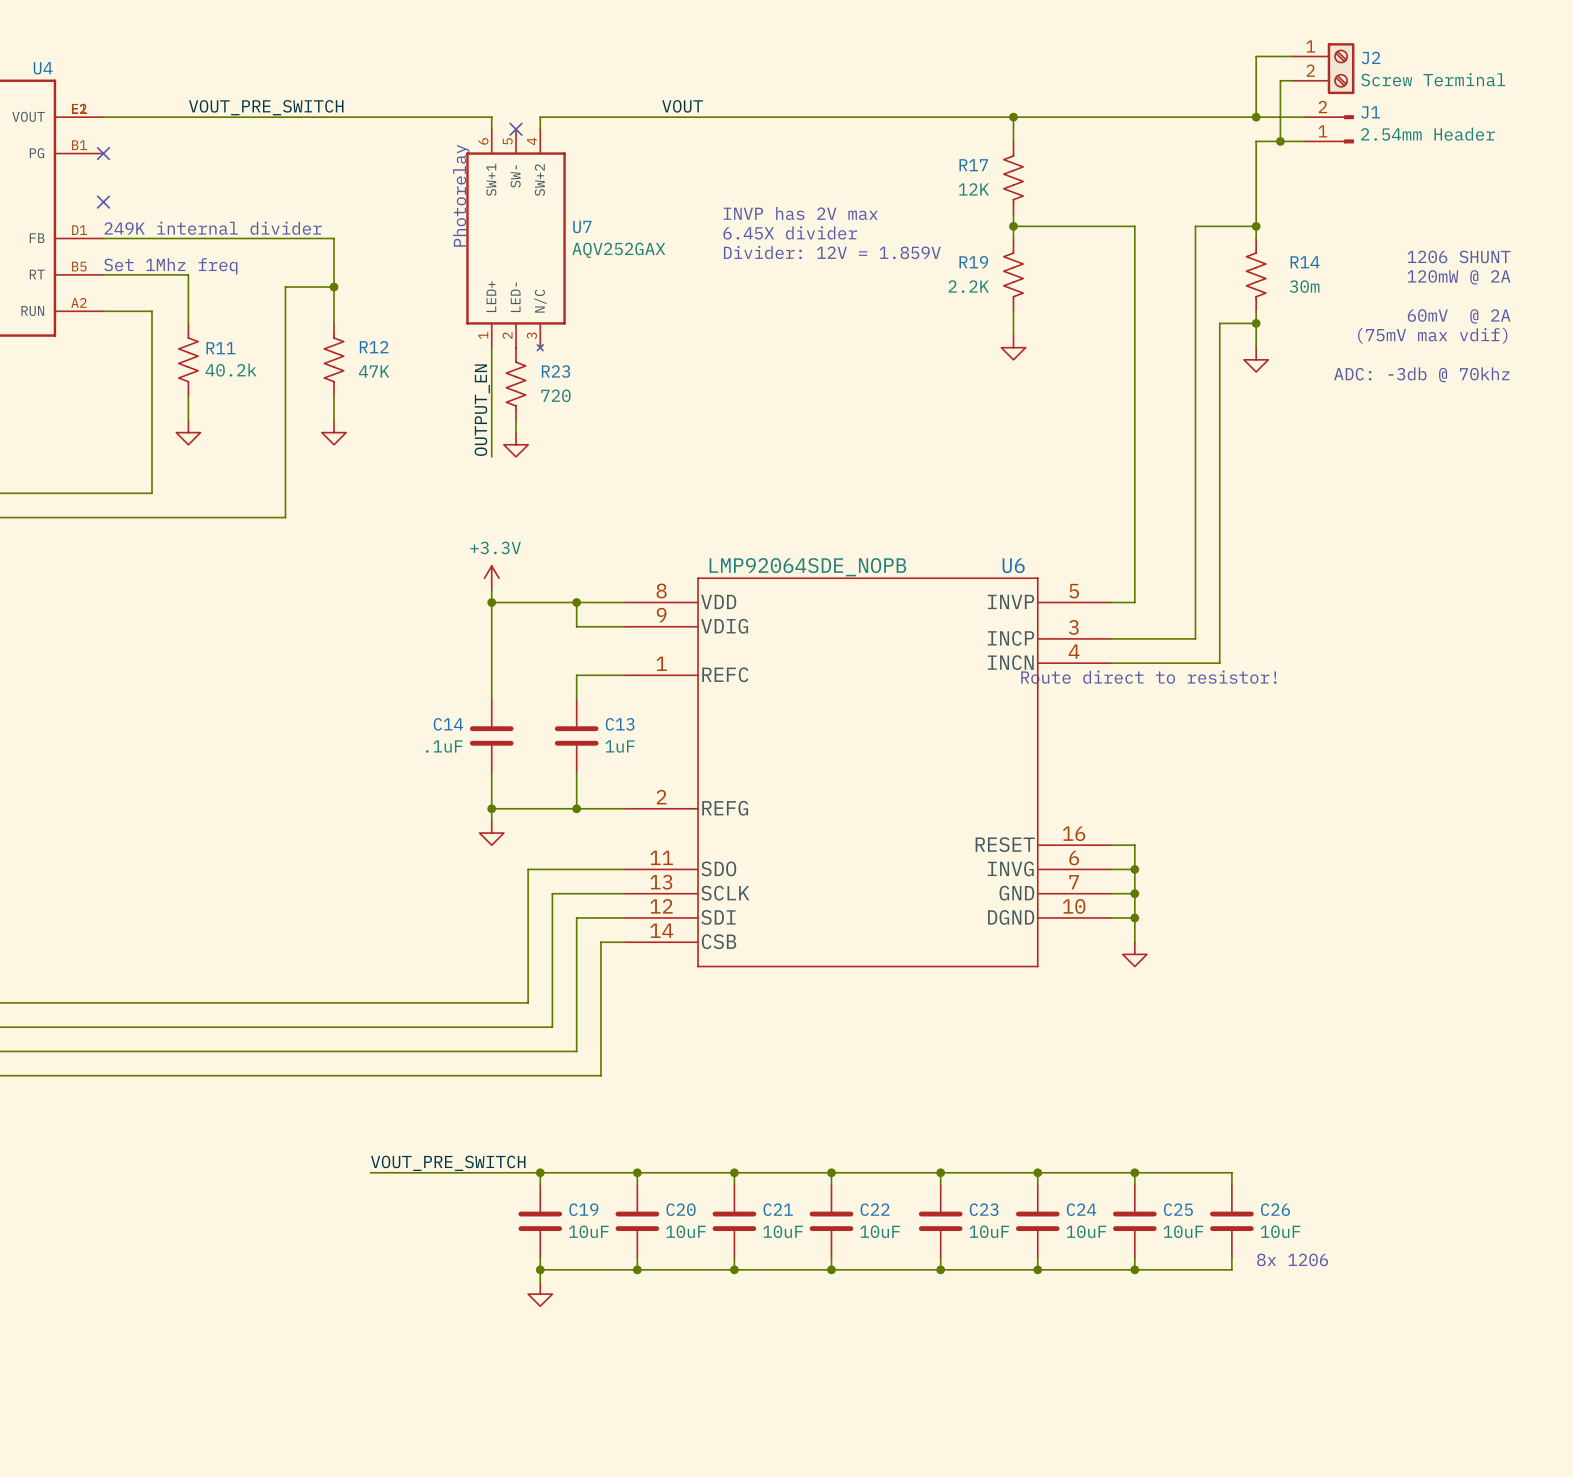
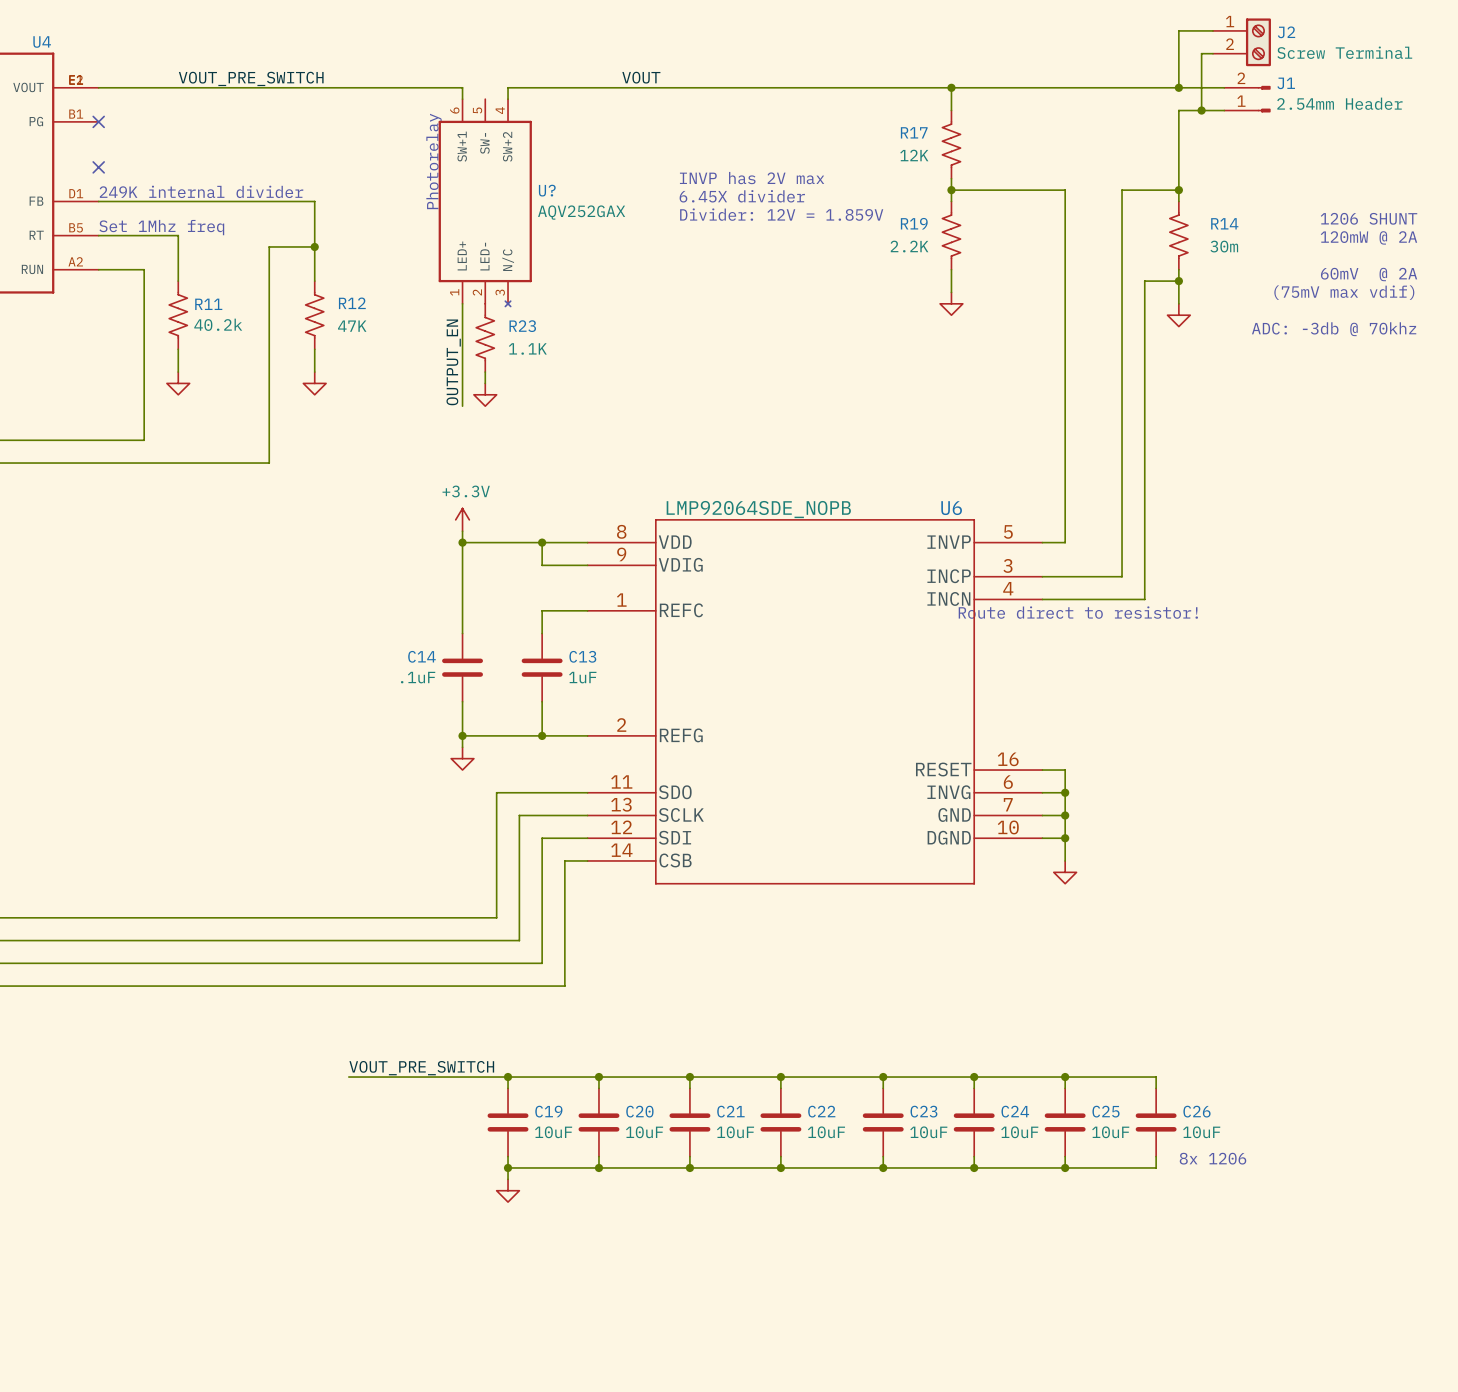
no-connect mark: (516, 129) -> none
U7 name: U7 (582, 226) -> U? (547, 190)
R23 value: 720 (556, 395) -> 1.1K (527, 348)

